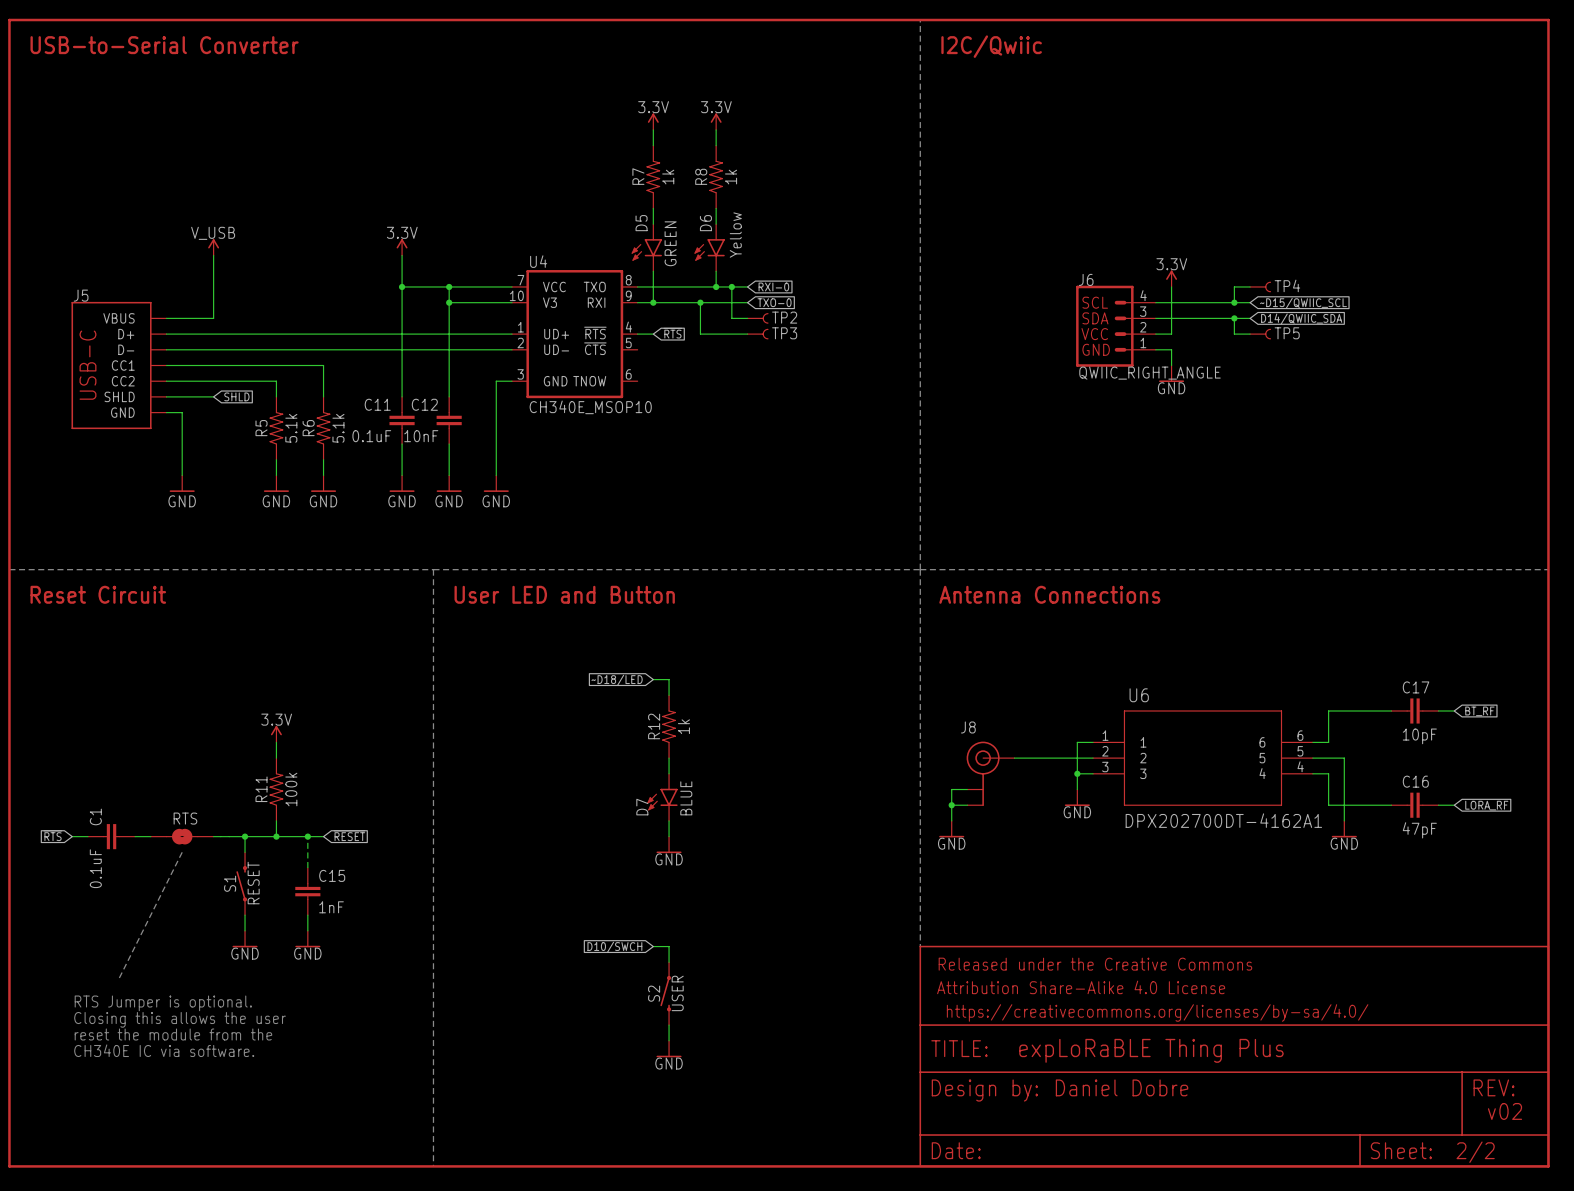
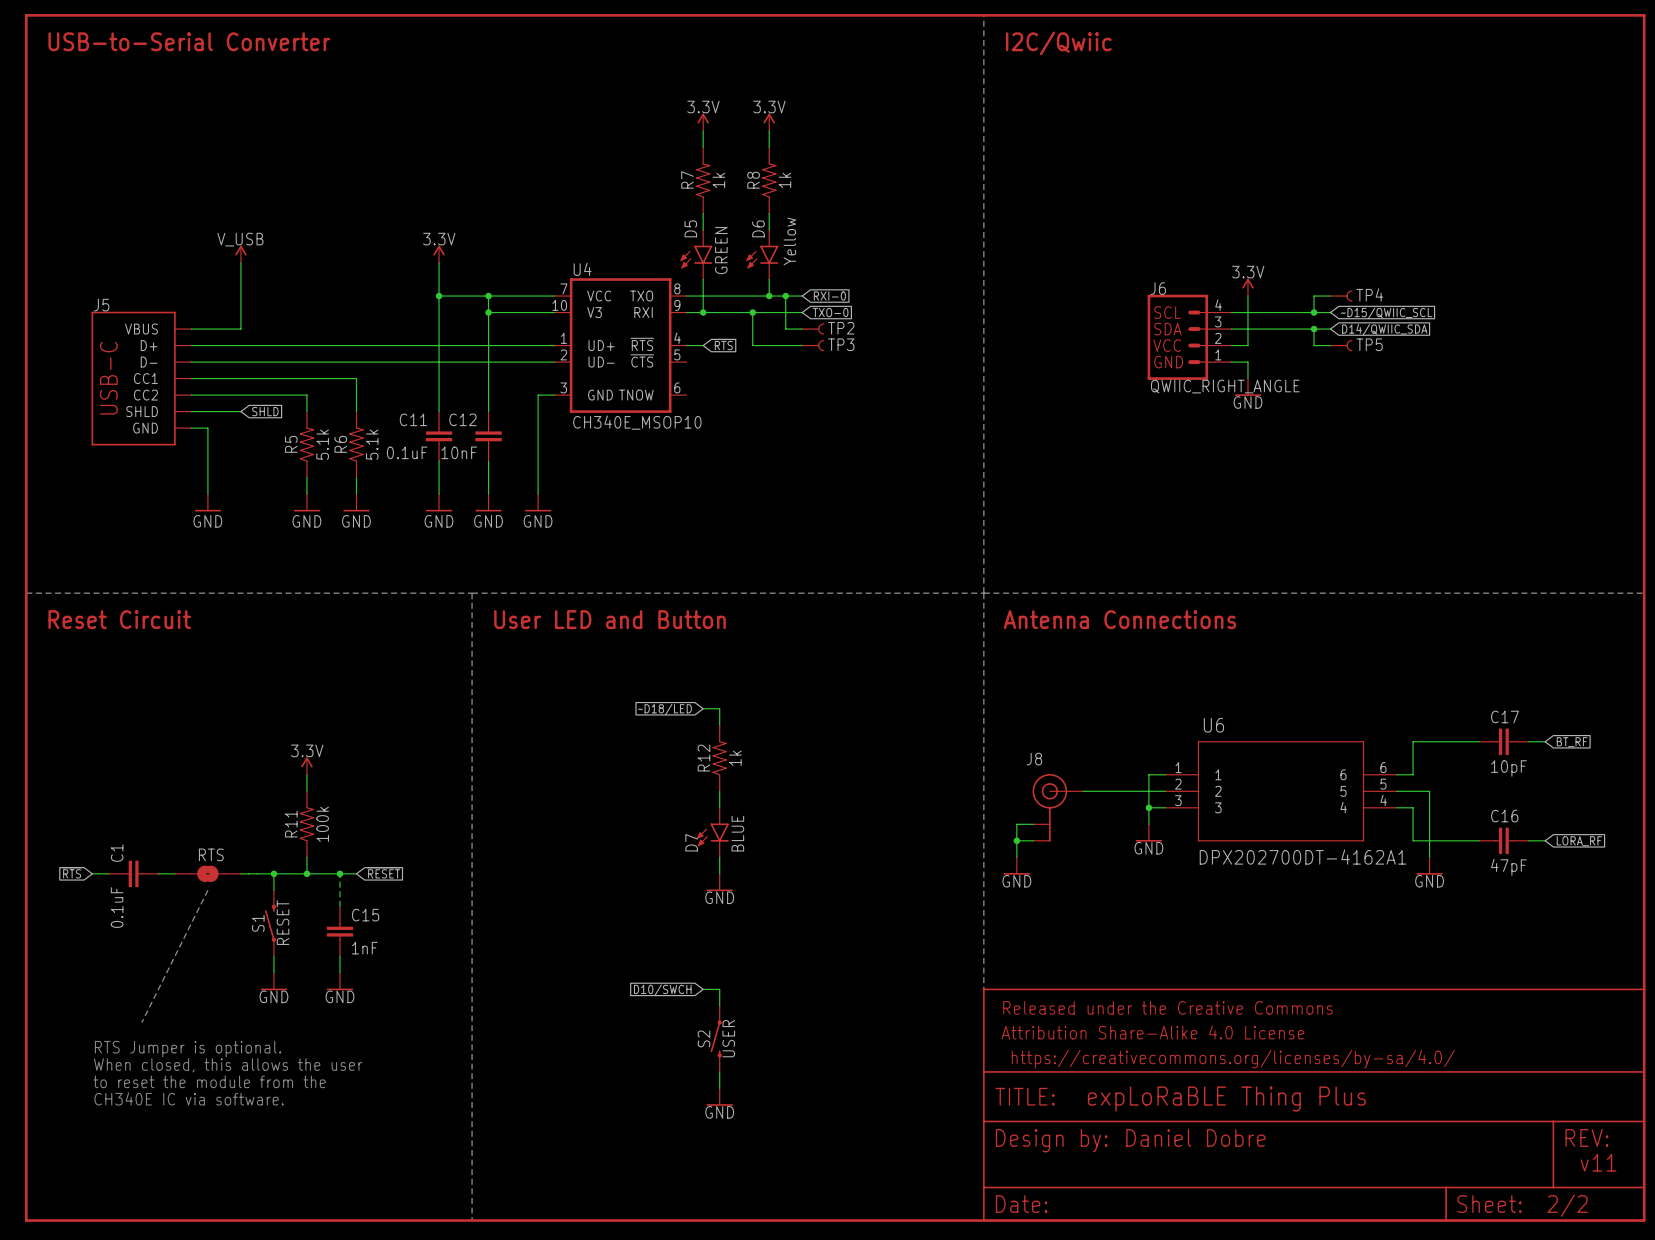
text: Closing this allows the user (180, 1019) -> When closed, this allows the user (228, 1065)
text: reset the module from the (173, 1034) -> to reset the module from the (209, 1081)
text: v02 (1504, 1111) -> v11 (1598, 1162)

